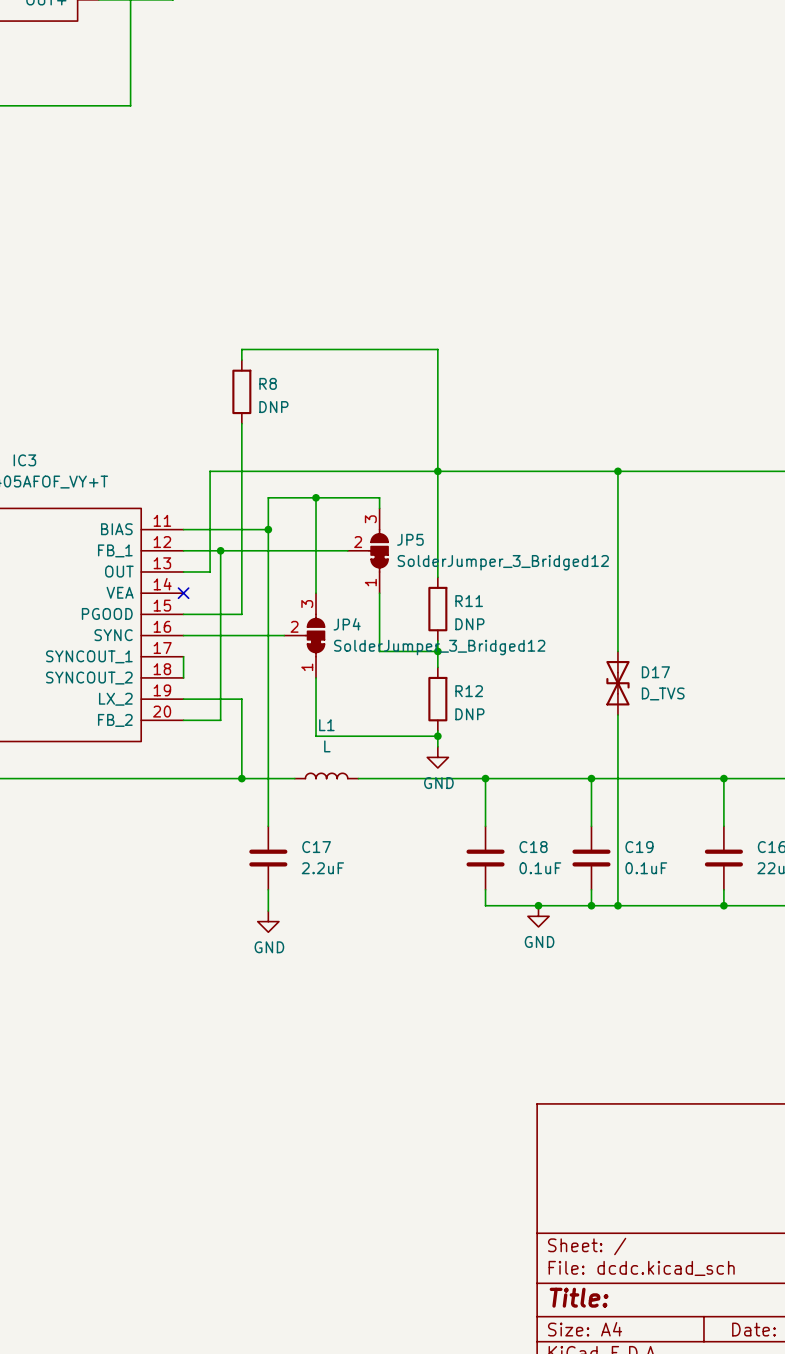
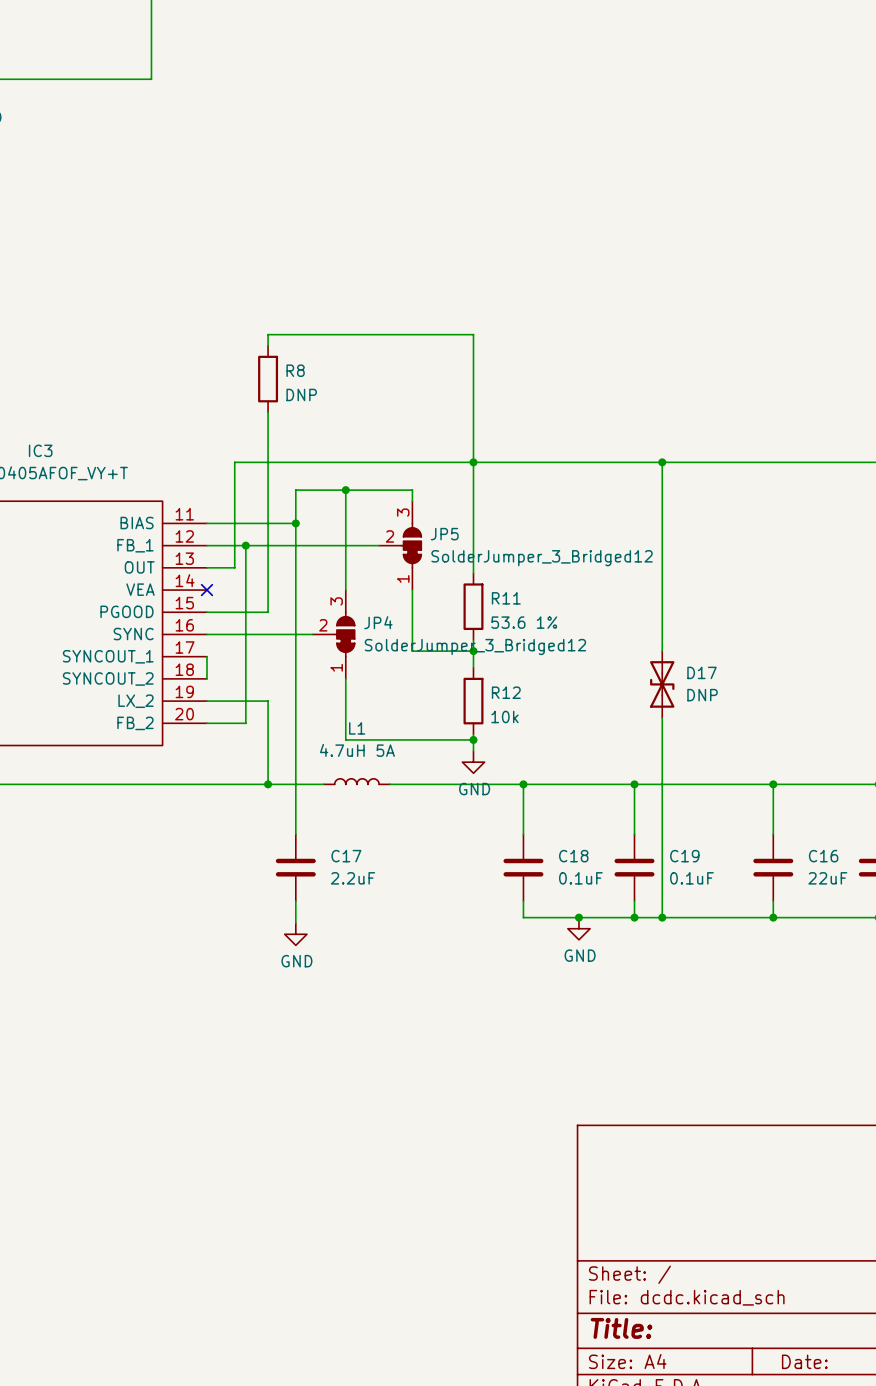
R11 value: DNP (469, 624) -> 53.6 1% (524, 622)
D17 value: D_TVS (663, 693) -> DNP (702, 695)
R12 value: DNP (469, 714) -> 10k (504, 716)
L1 value: L (327, 746) -> 4.7uH 5A (357, 750)

